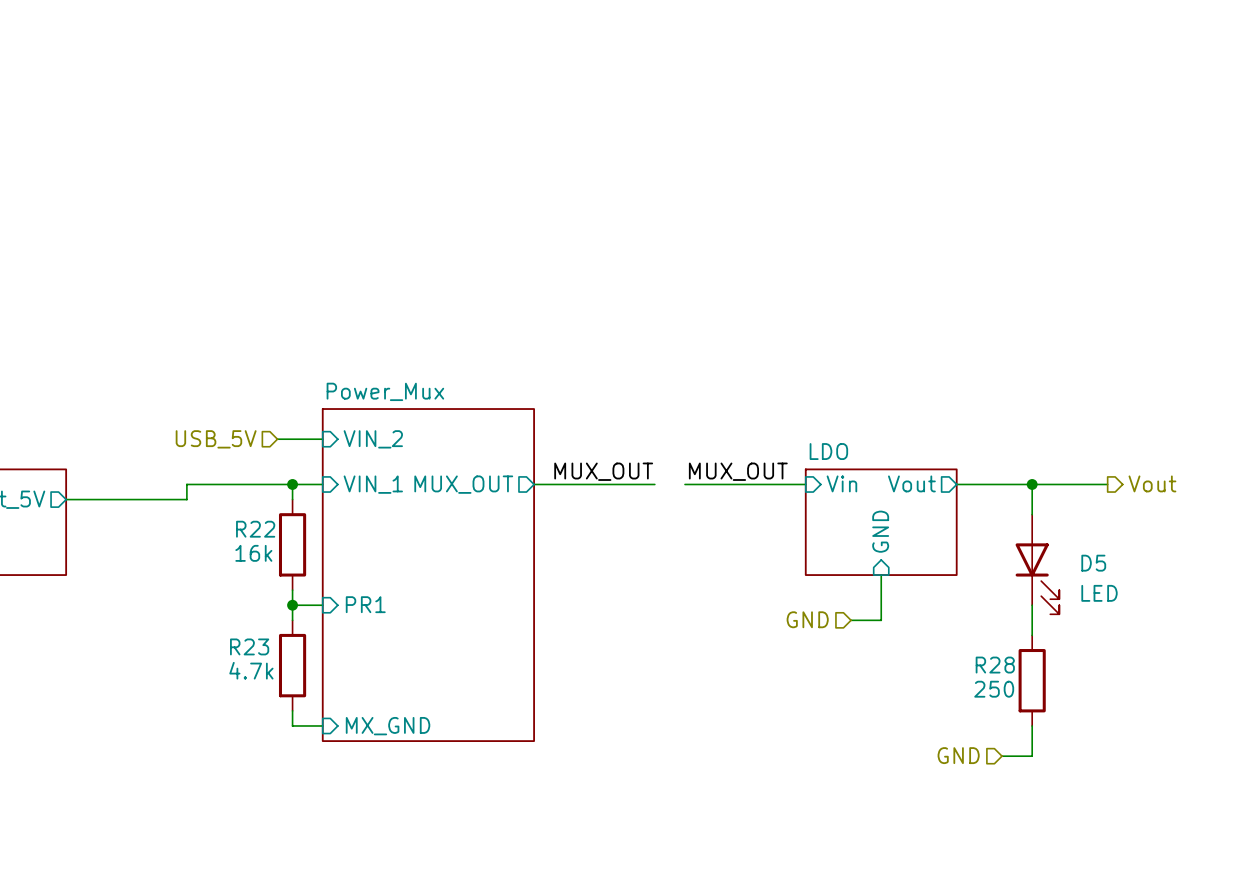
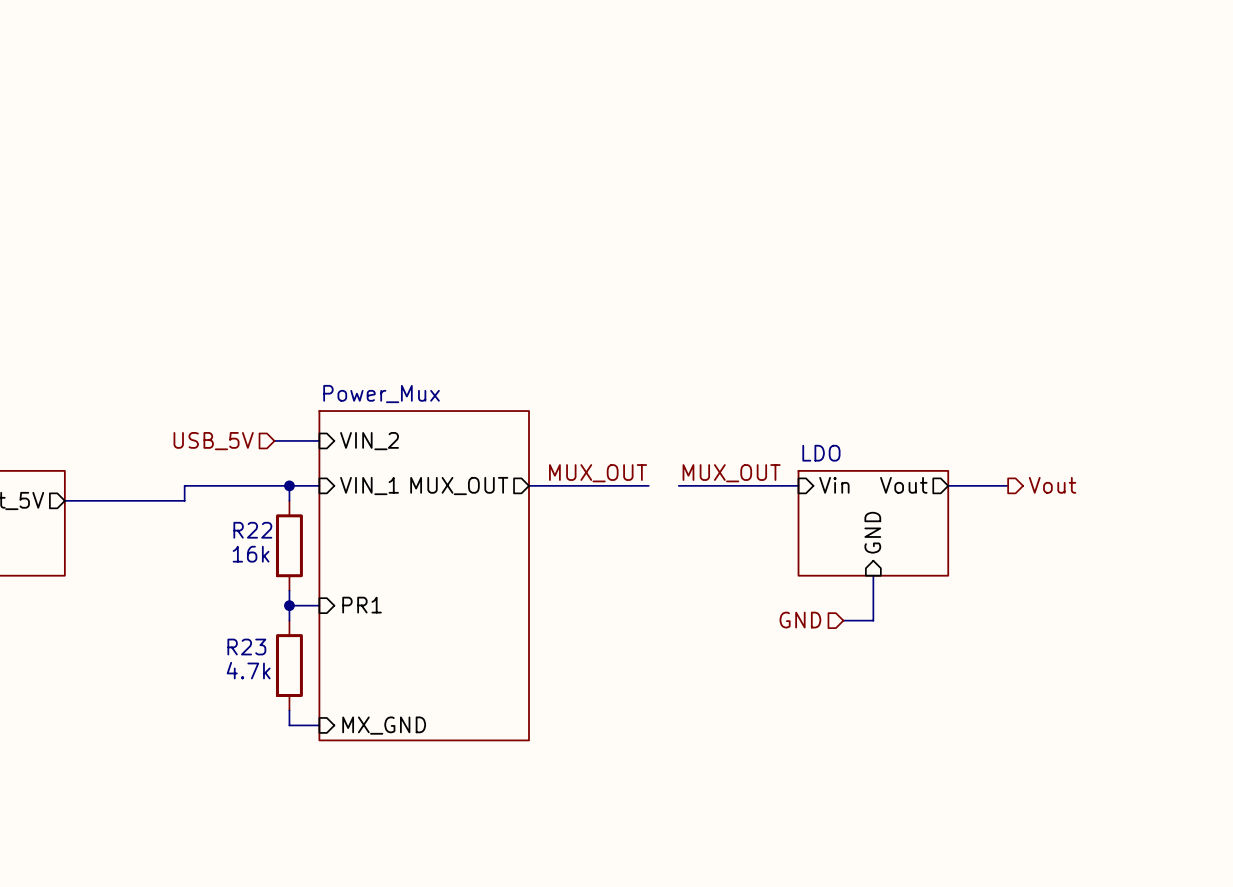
hierarchical label position: Vout (1152, 483) -> Vout (1052, 485)
wire: (1017, 484) (1107, 484) -> none
wire: (1032, 484) (1032, 514) -> none
junction: (1032, 484) -> none
D5: LED (1037, 564) -> none
wire: (1032, 605) (1032, 635) -> none
R28: 250 (1032, 680) -> none
wire: (1032, 725) (1032, 756) (1001, 756) -> none
hierarchical label: GND (958, 755) -> none

